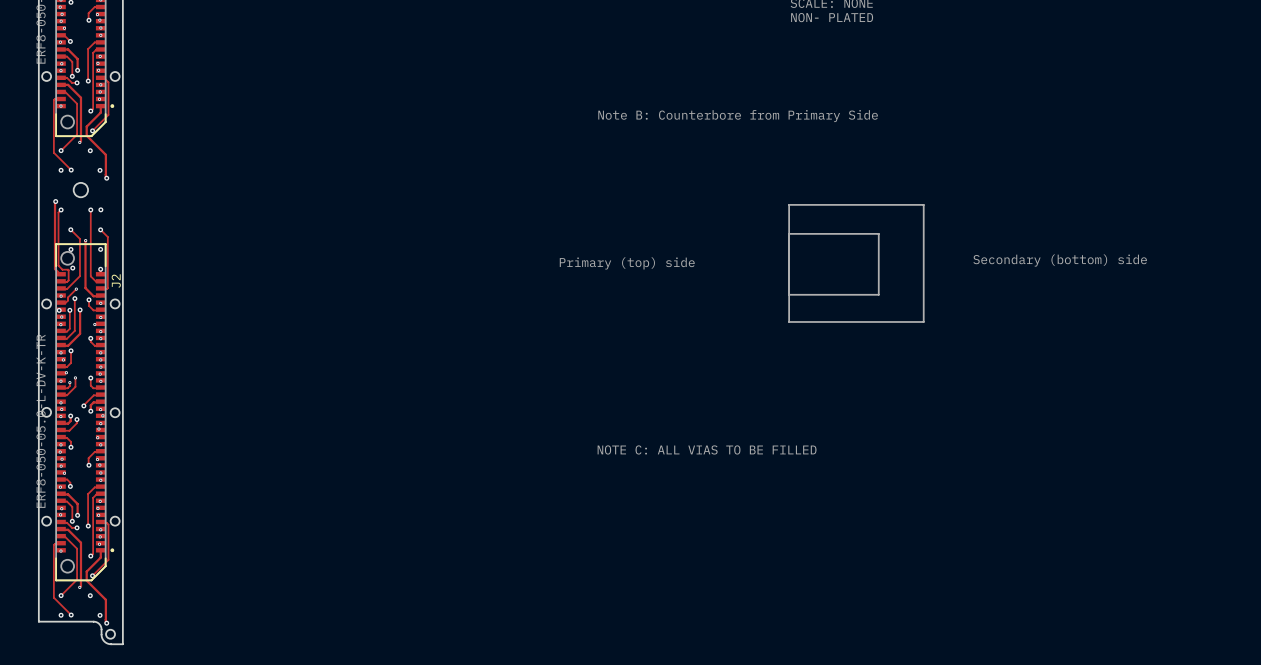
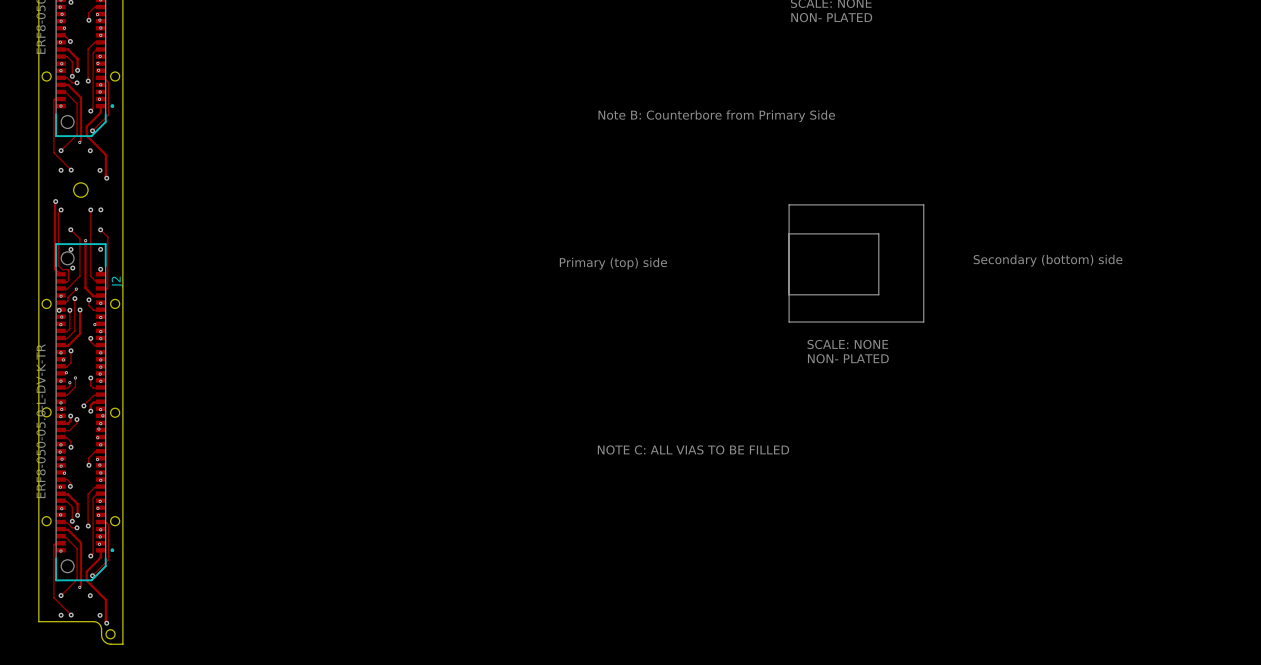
text: none -> SCALE: NONE (847, 344)
text: none -> NON- PLATED (848, 358)

